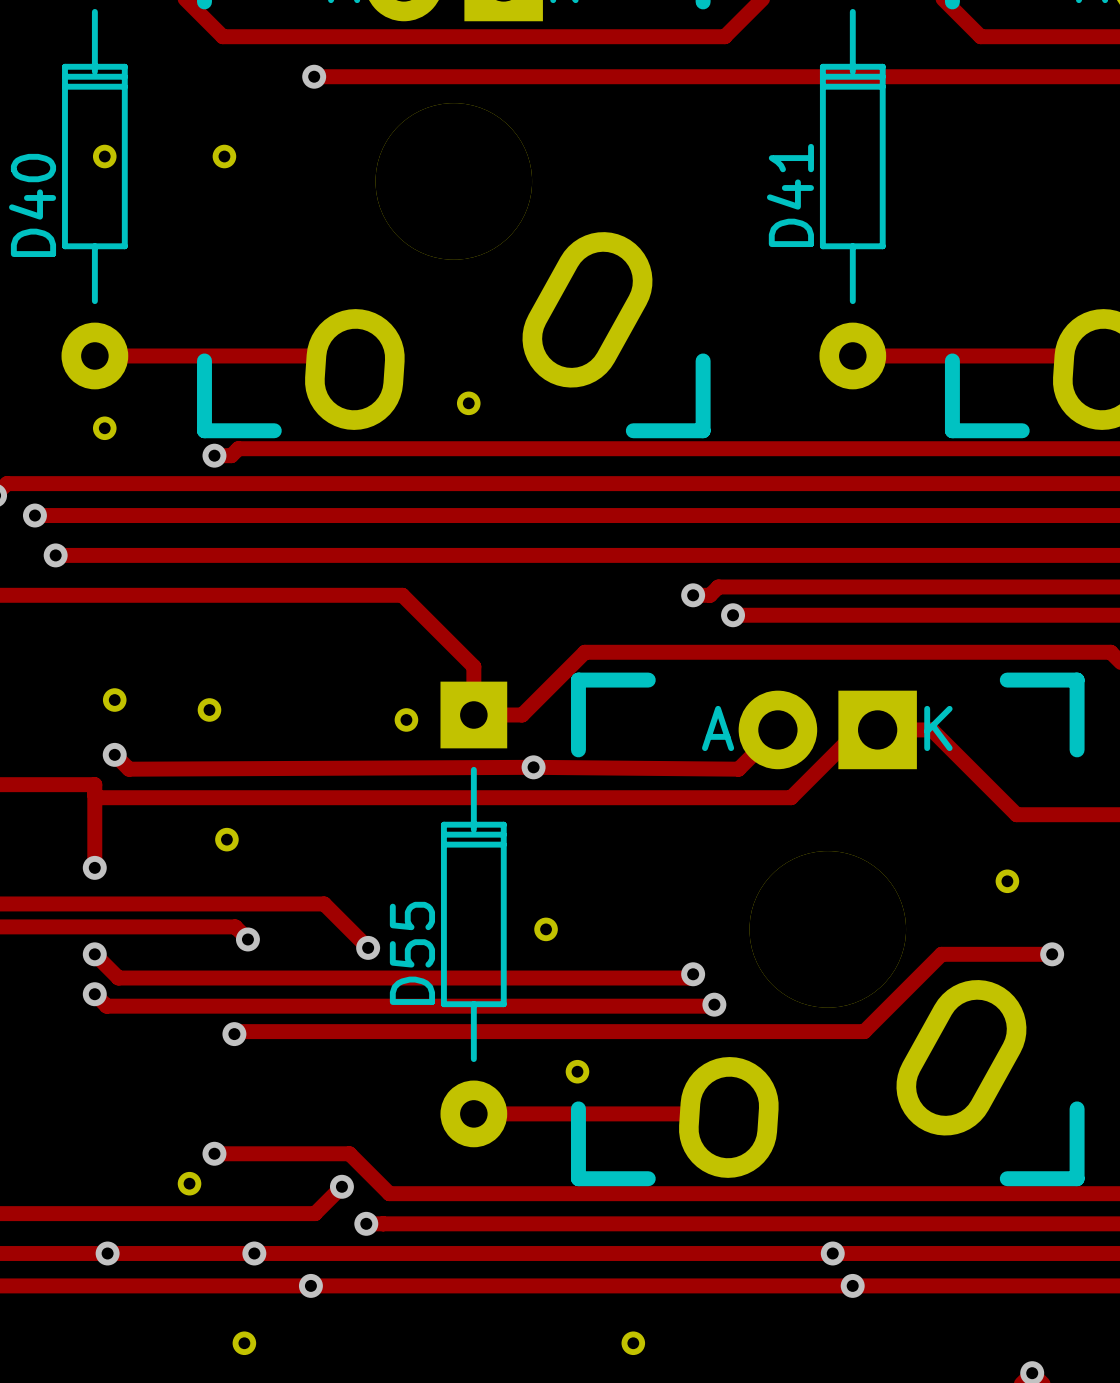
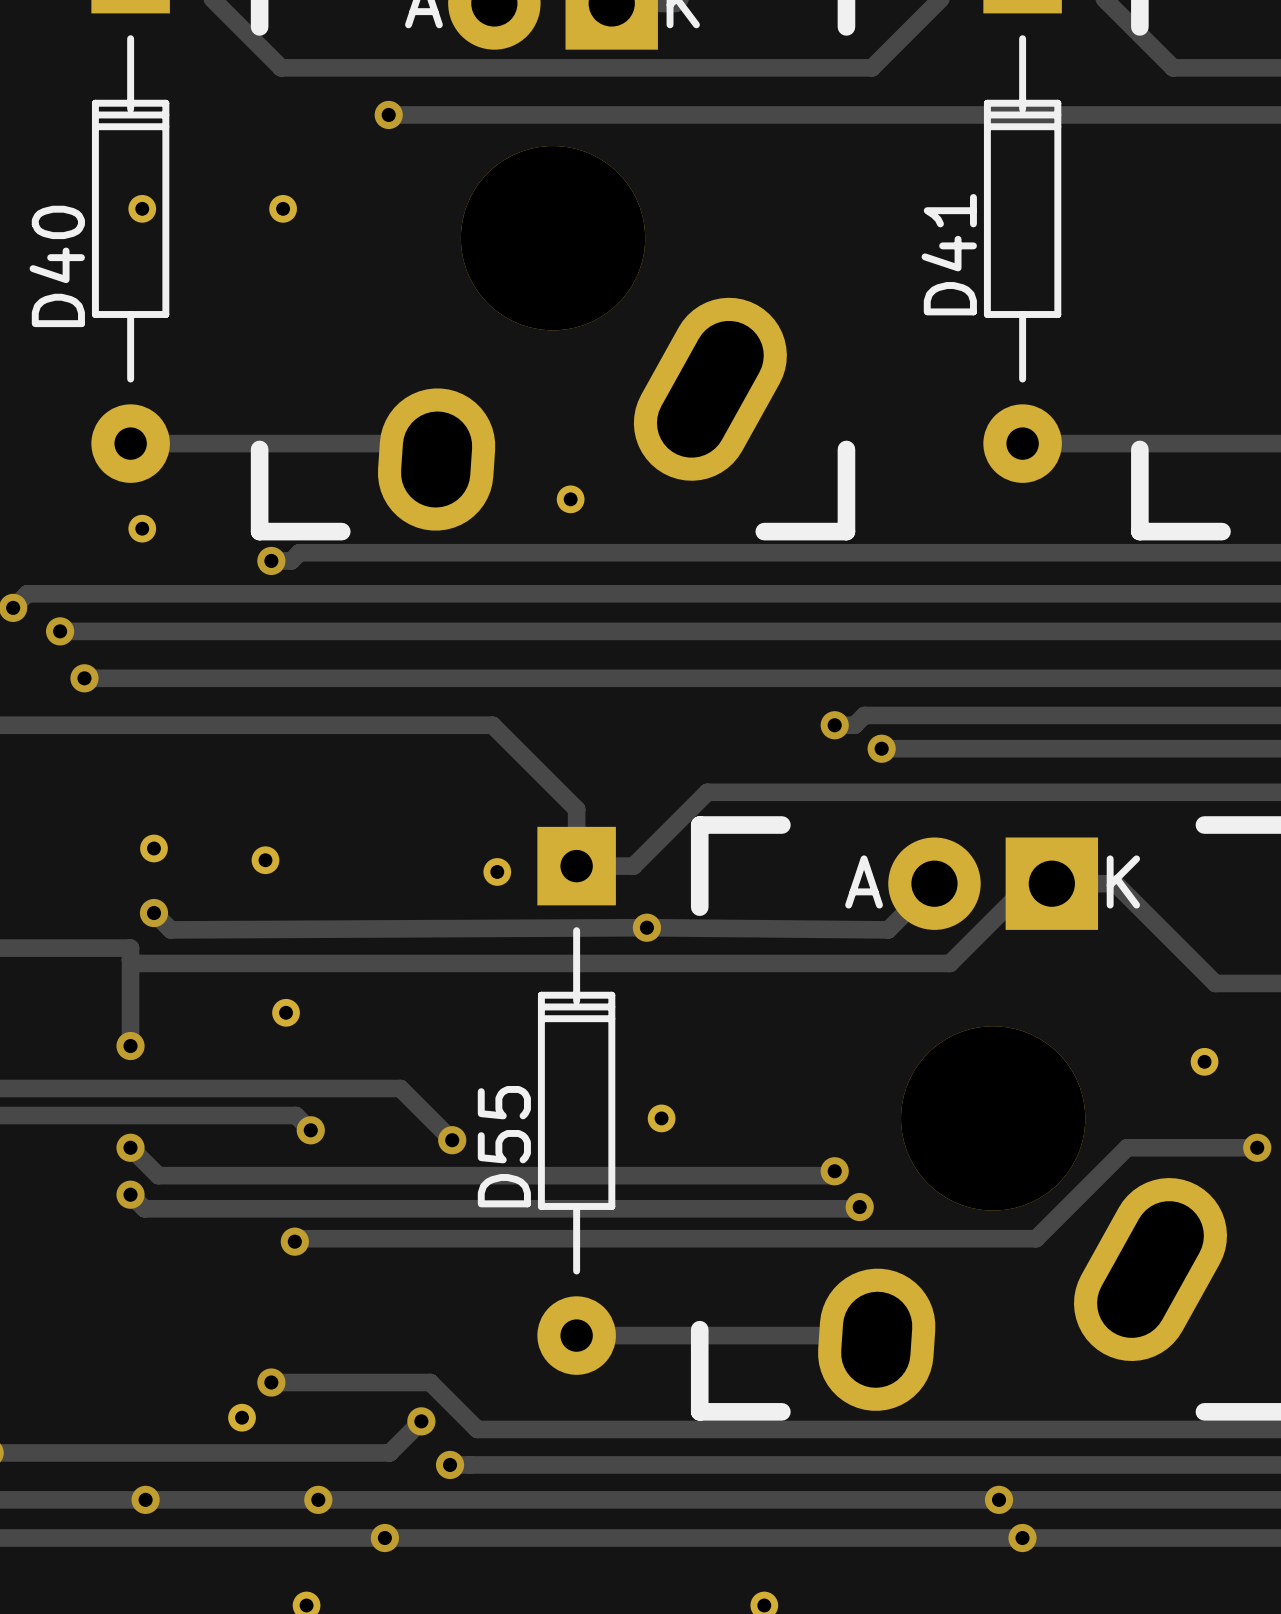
part: (577, 1071) -> none

